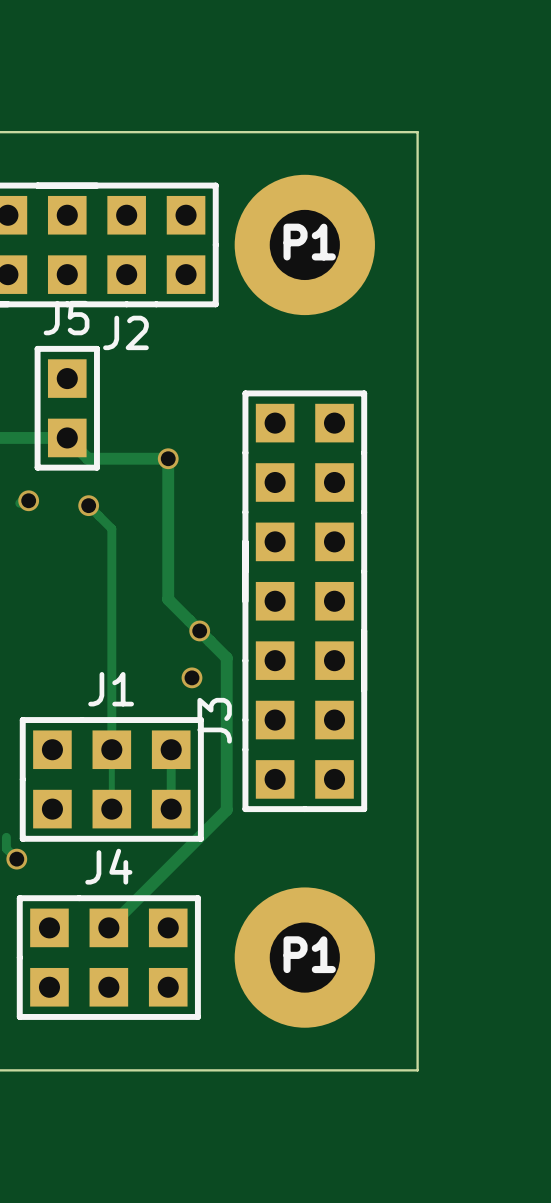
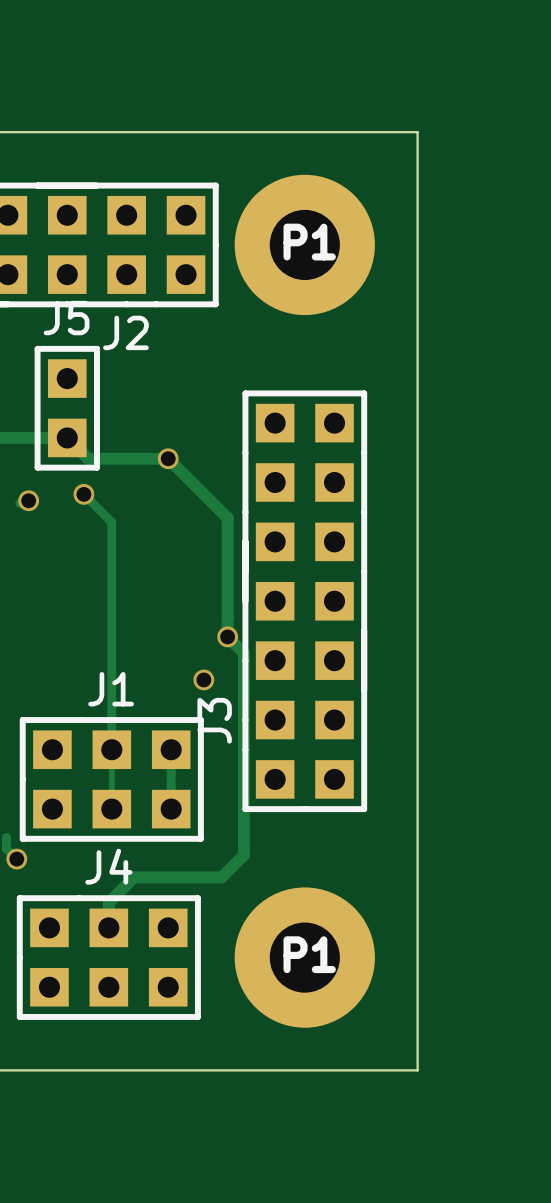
track: (168, 458) (168, 599) (226, 657) (226, 810) (108, 927) -> (168, 458) (227, 518) (227, 636) (243, 653) (243, 855) (221, 877) (134, 877) (108, 902) (108, 927)
track: (88, 505) (111, 528) -> (83, 494) (111, 522) (111, 528)
via position: (88, 505) -> (83, 494)
via: (199, 630) -> none
via: none -> (227, 636)
via position: (191, 677) -> (203, 679)

